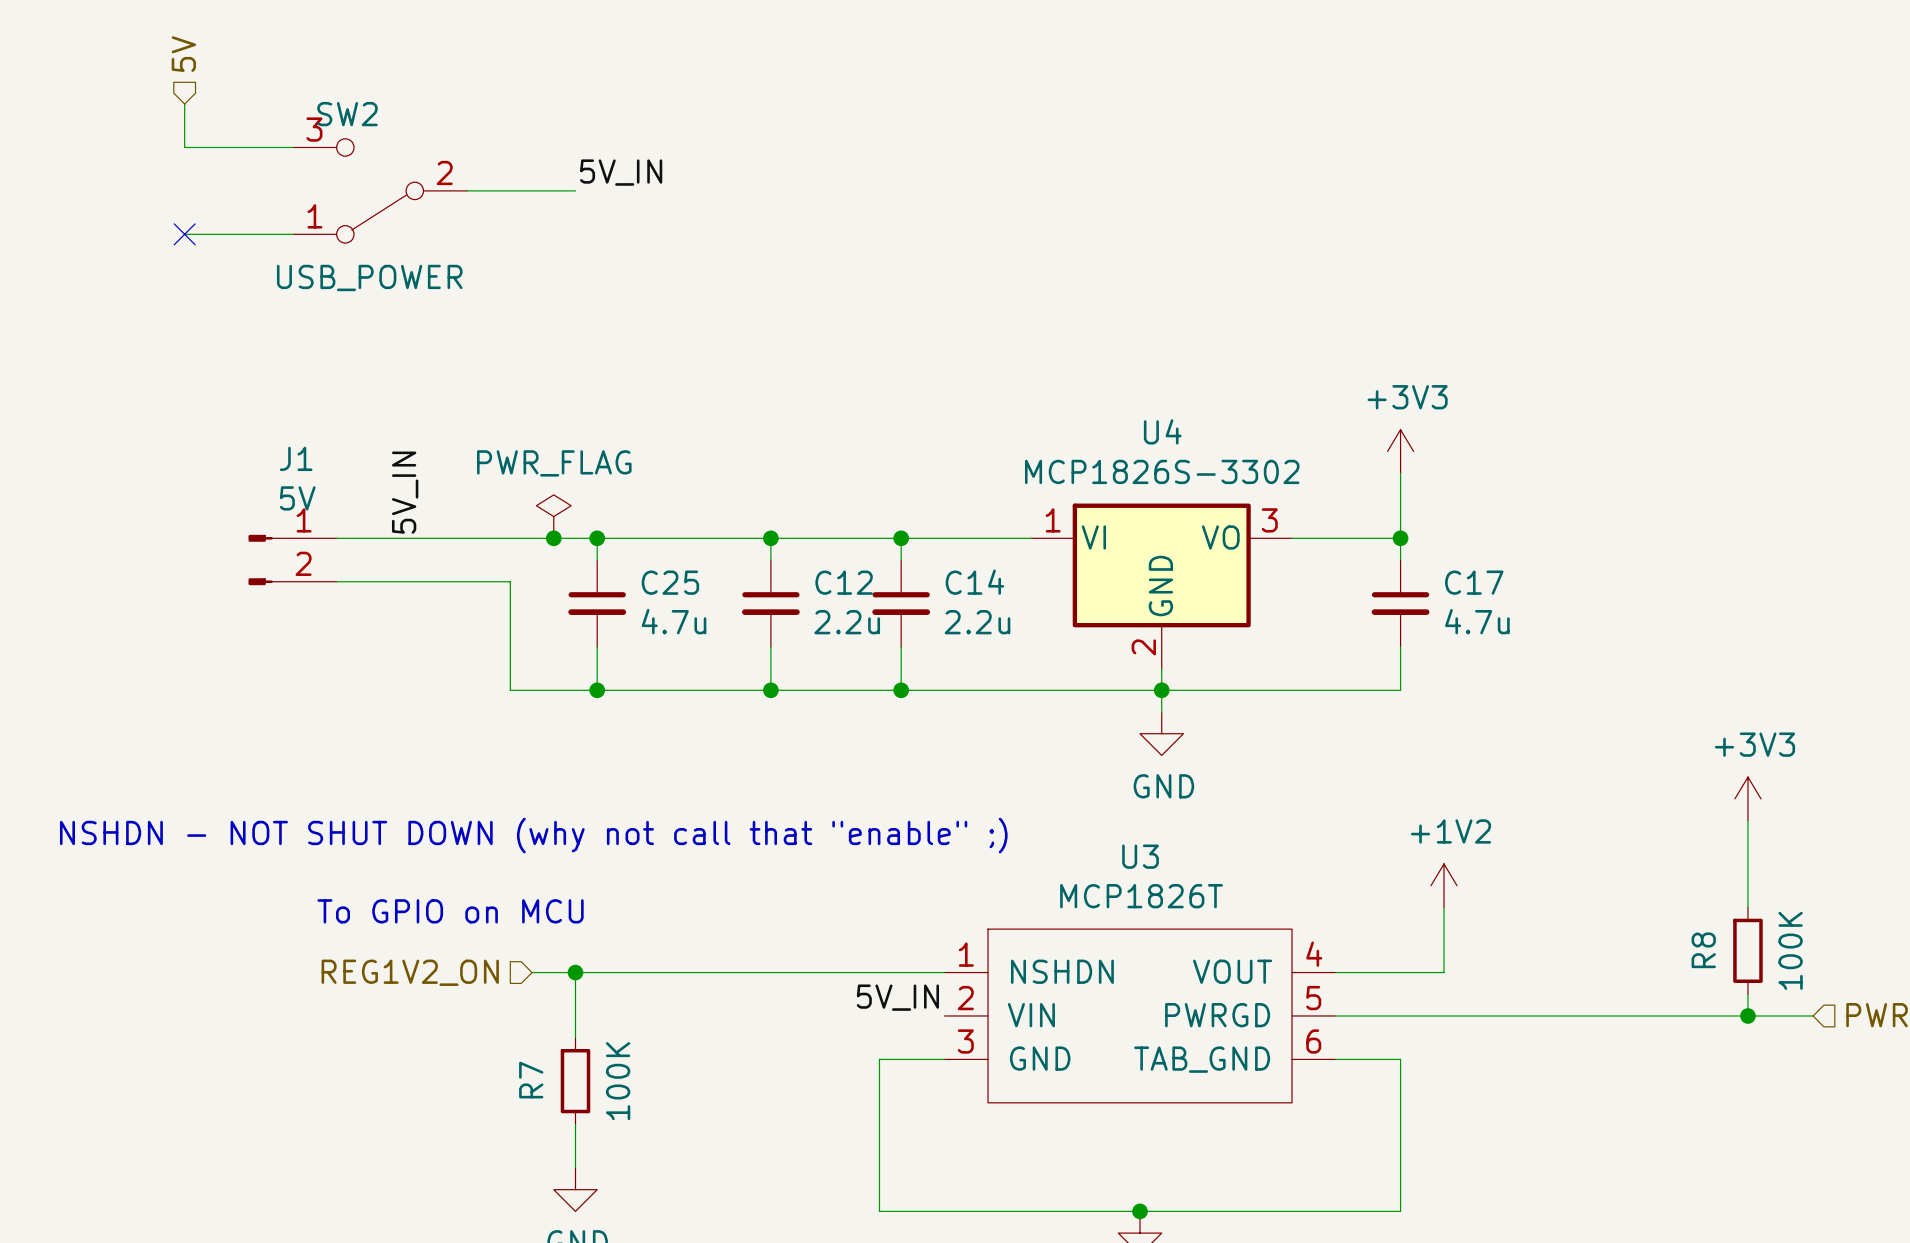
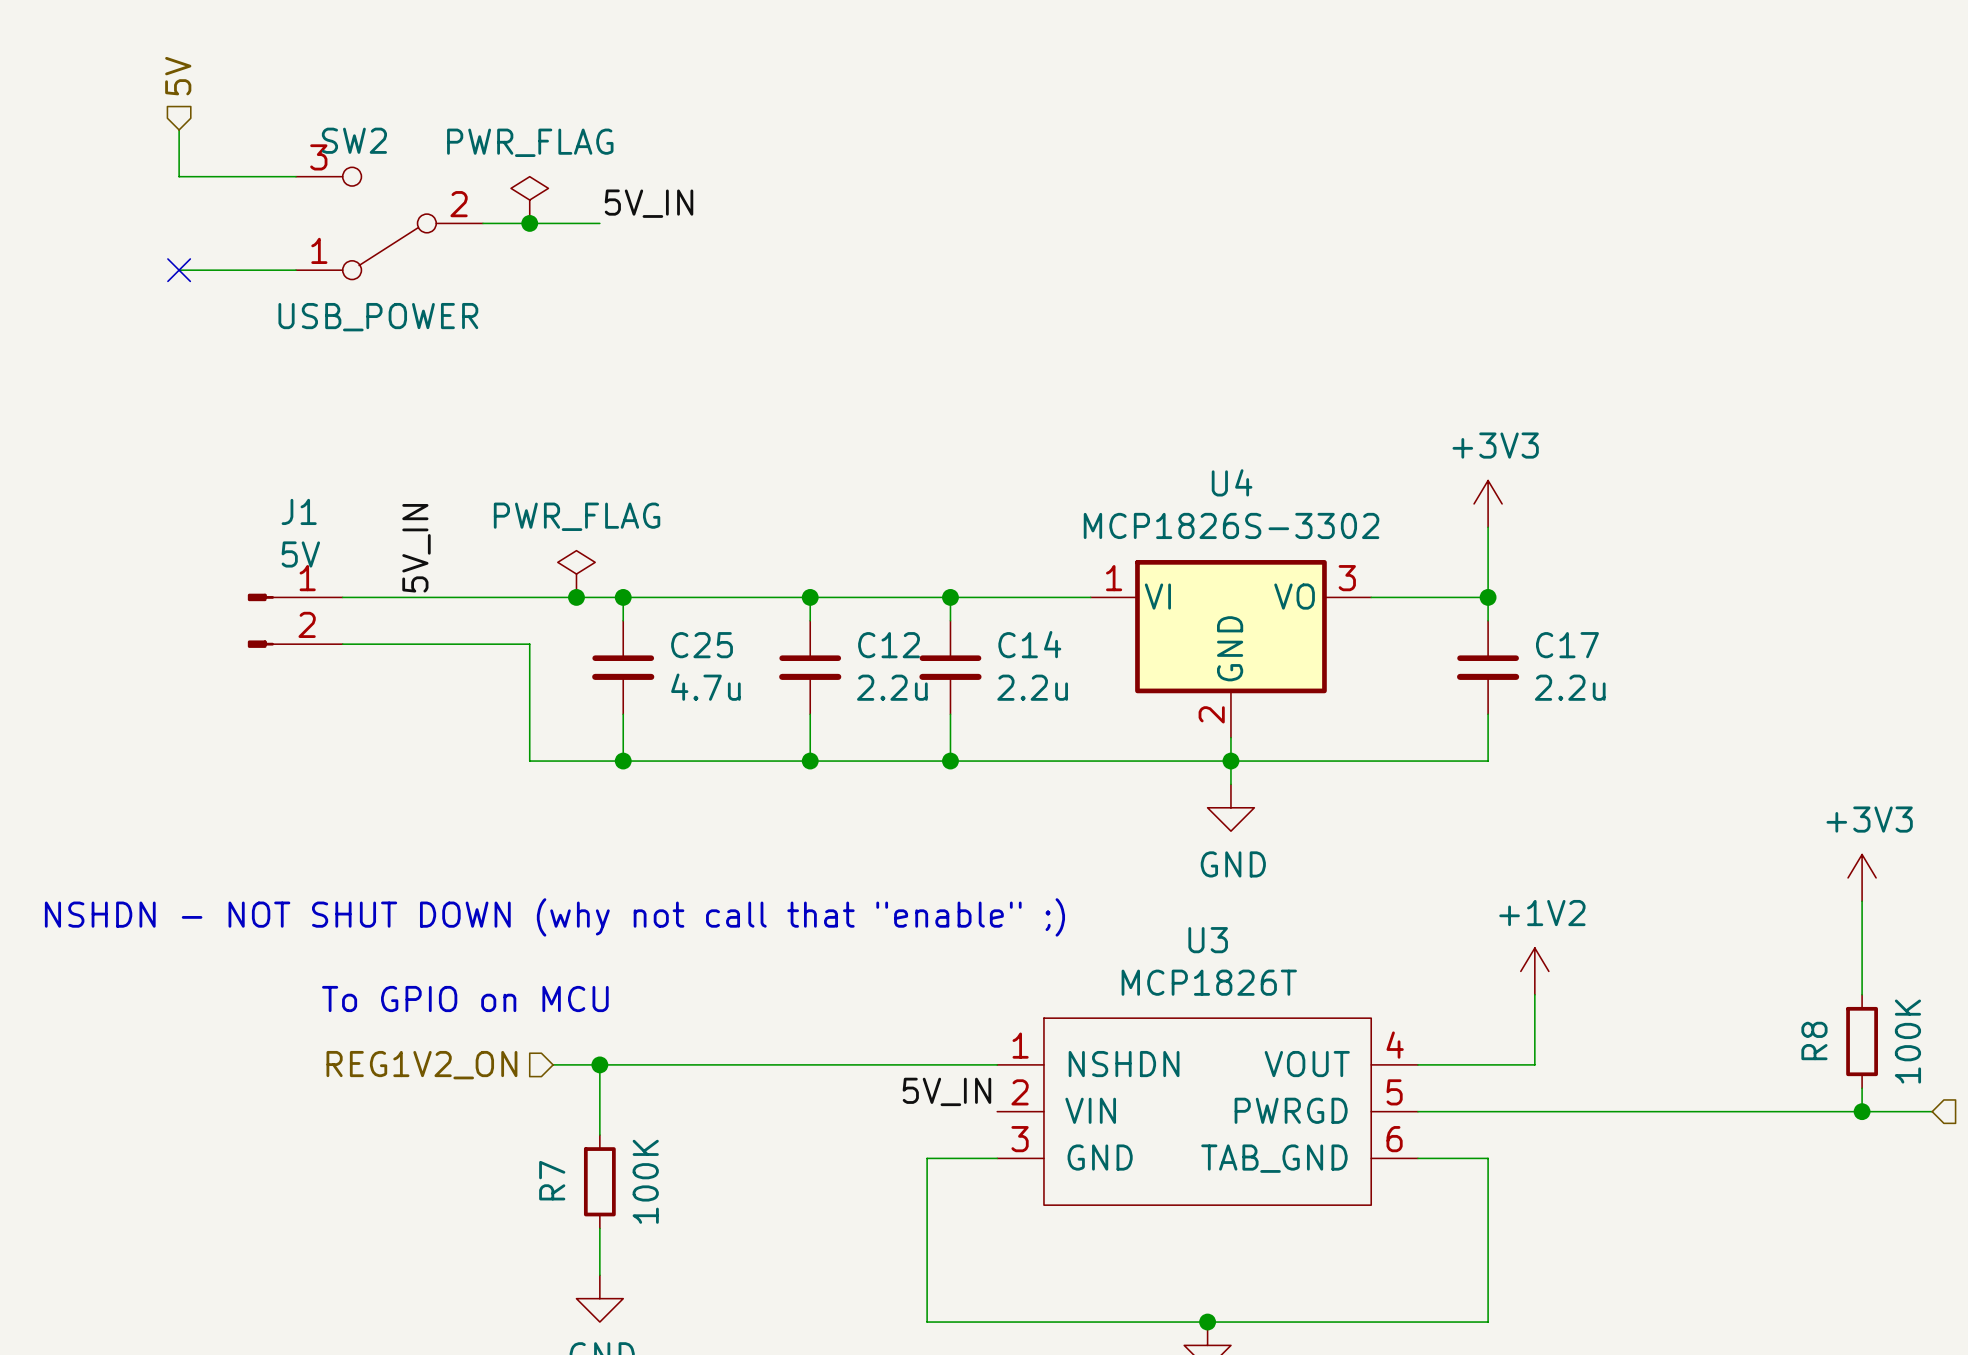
power symbol: none -> PWR_FLAG (529, 200)
junction: none -> (529, 223)
C17 value: 4.7u (1477, 621) -> 2.2u (1570, 687)

